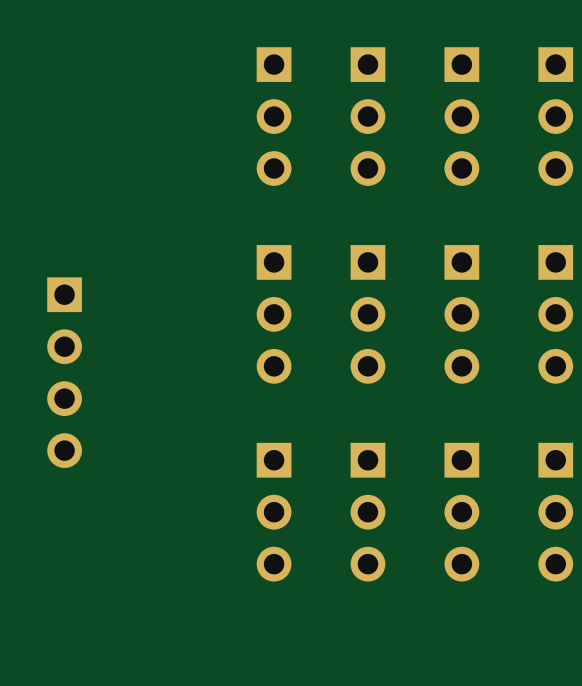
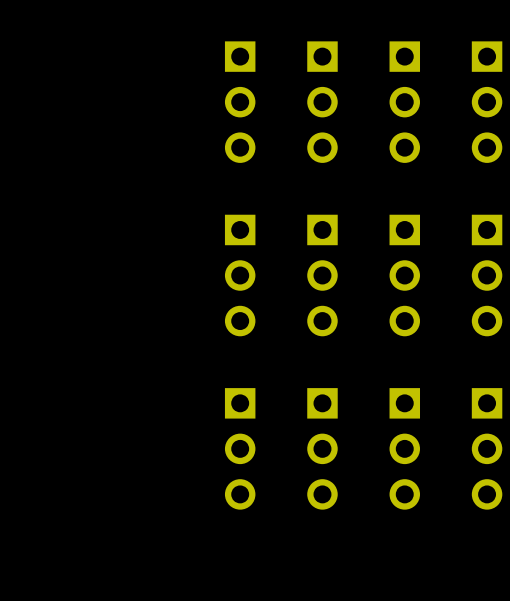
part: (64, 372) -> none

